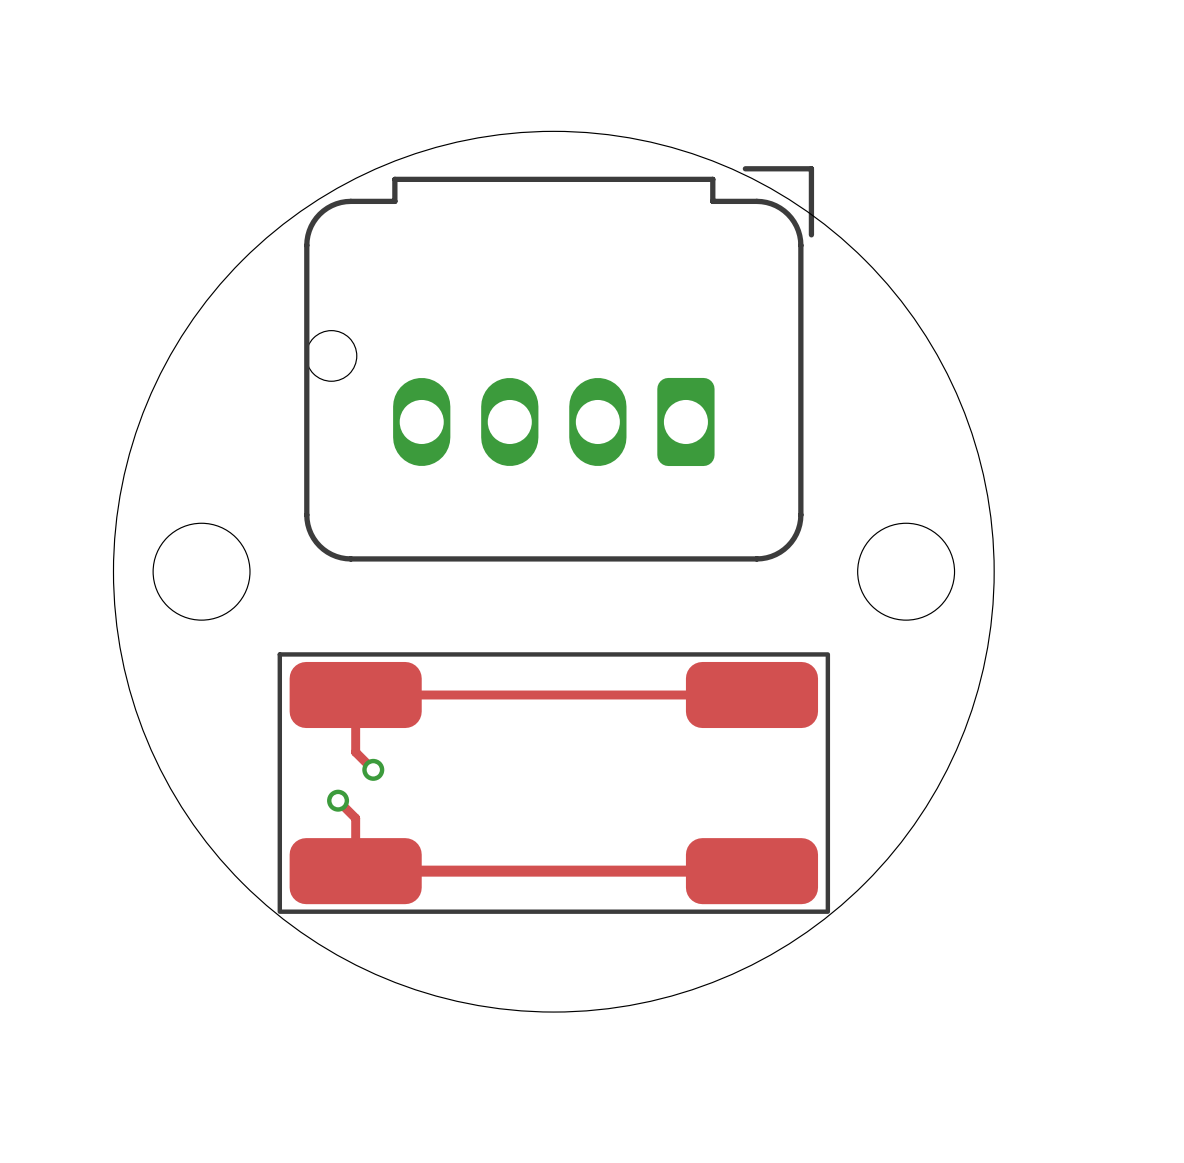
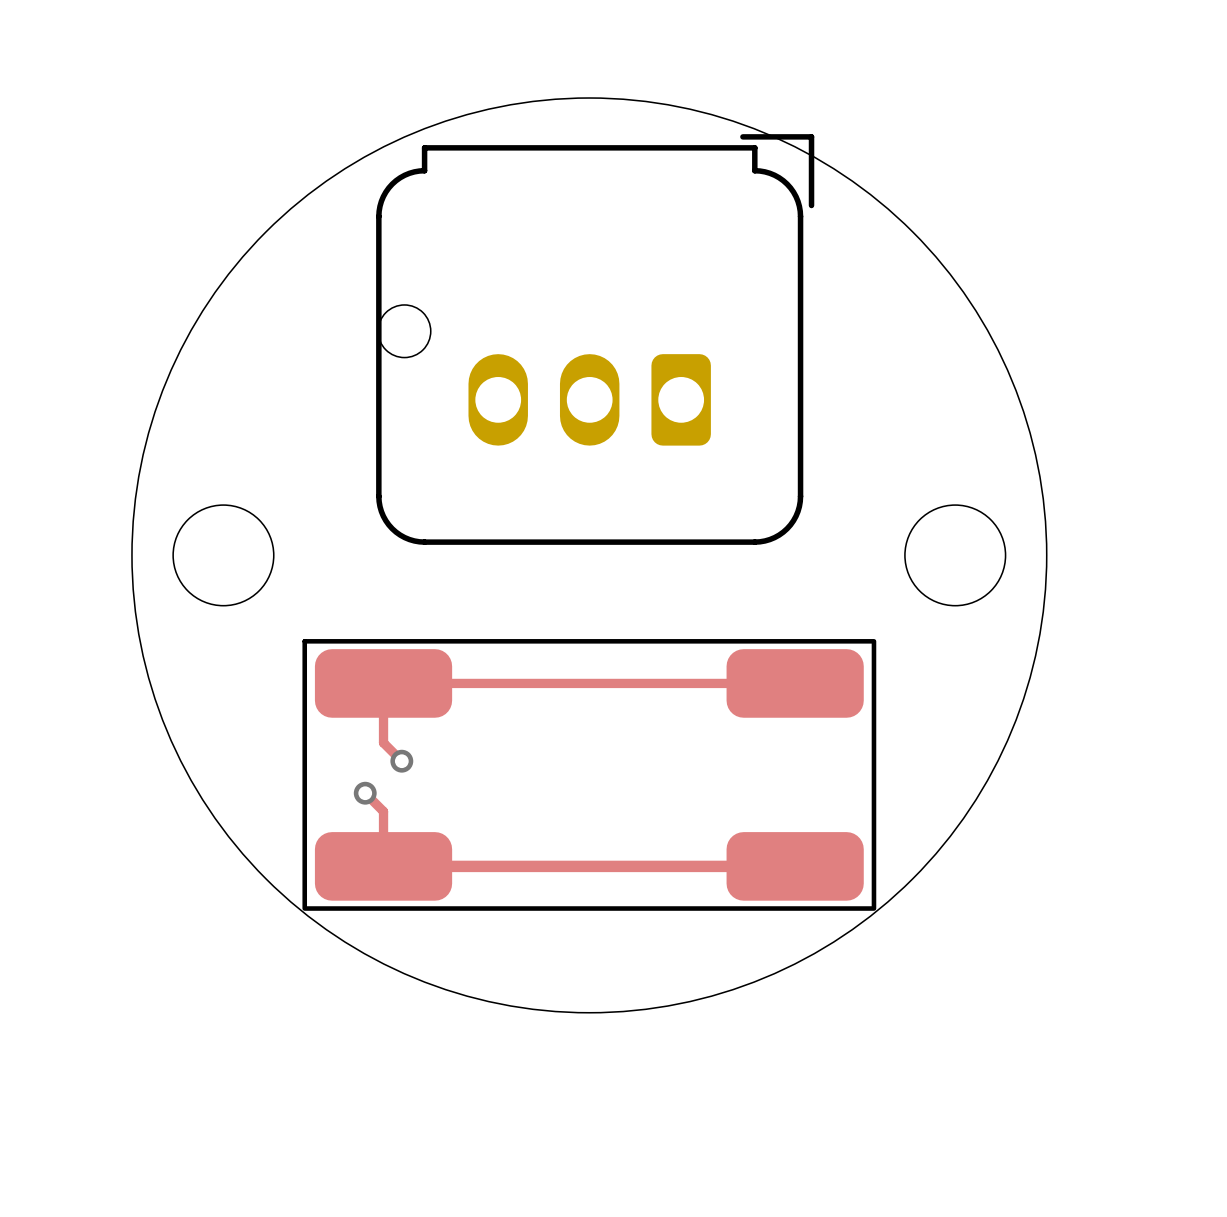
part footprint: [304, 166, 815, 562] -> [376, 134, 815, 545]

